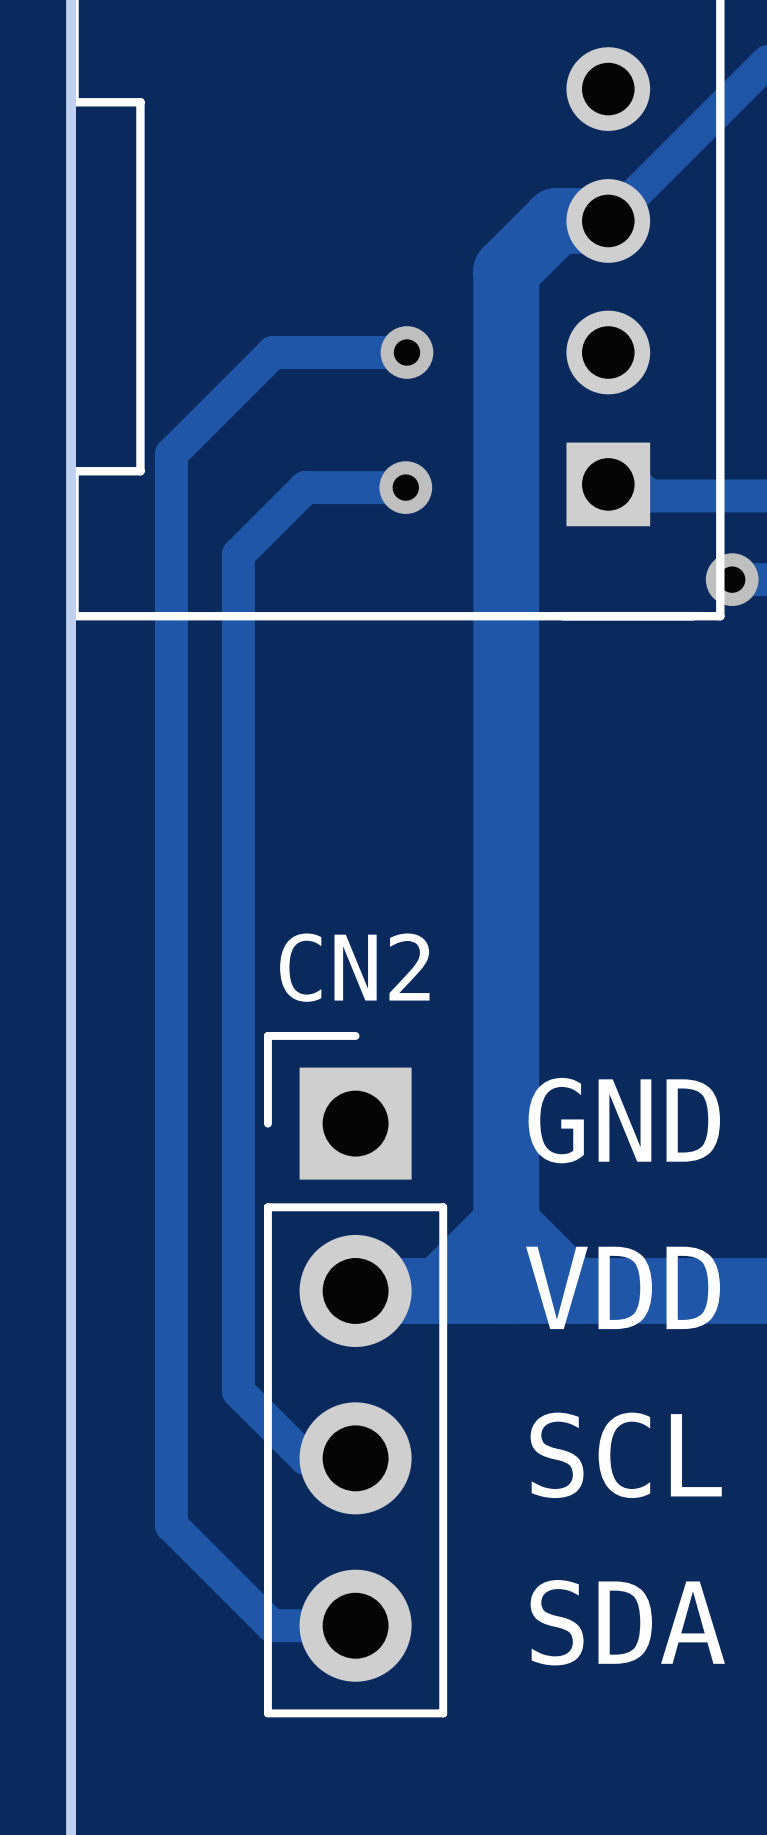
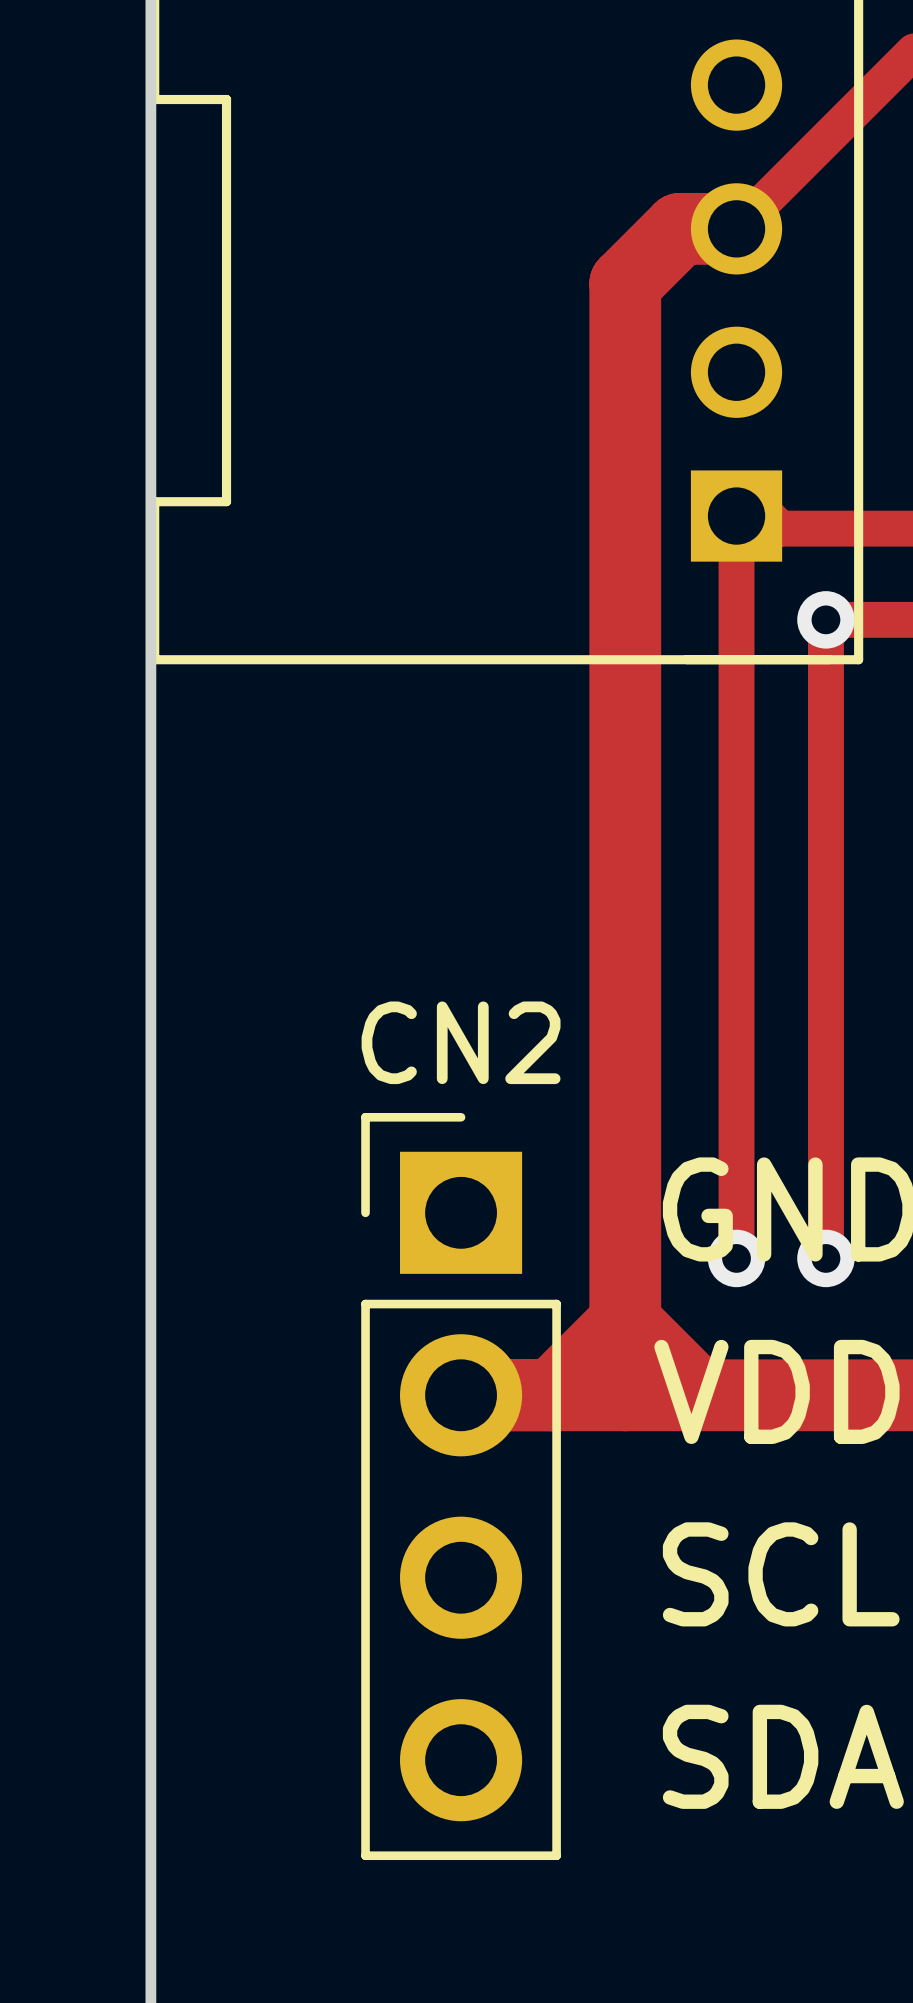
track: (406, 352) (273, 352) (171, 454) (171, 1525) (271, 1625) (355, 1625) -> none
via: (406, 352) -> none
track: none -> (736, 516) (736, 1258)
track: (405, 487) (305, 487) (238, 554) (238, 1391) (305, 1458) (355, 1458) -> none
via: (405, 487) -> none
track: none -> (871, 619) (825, 619) (825, 1258)
via position: (732, 579) -> (825, 619)
via: none -> (736, 1258)
via: none -> (825, 1258)

